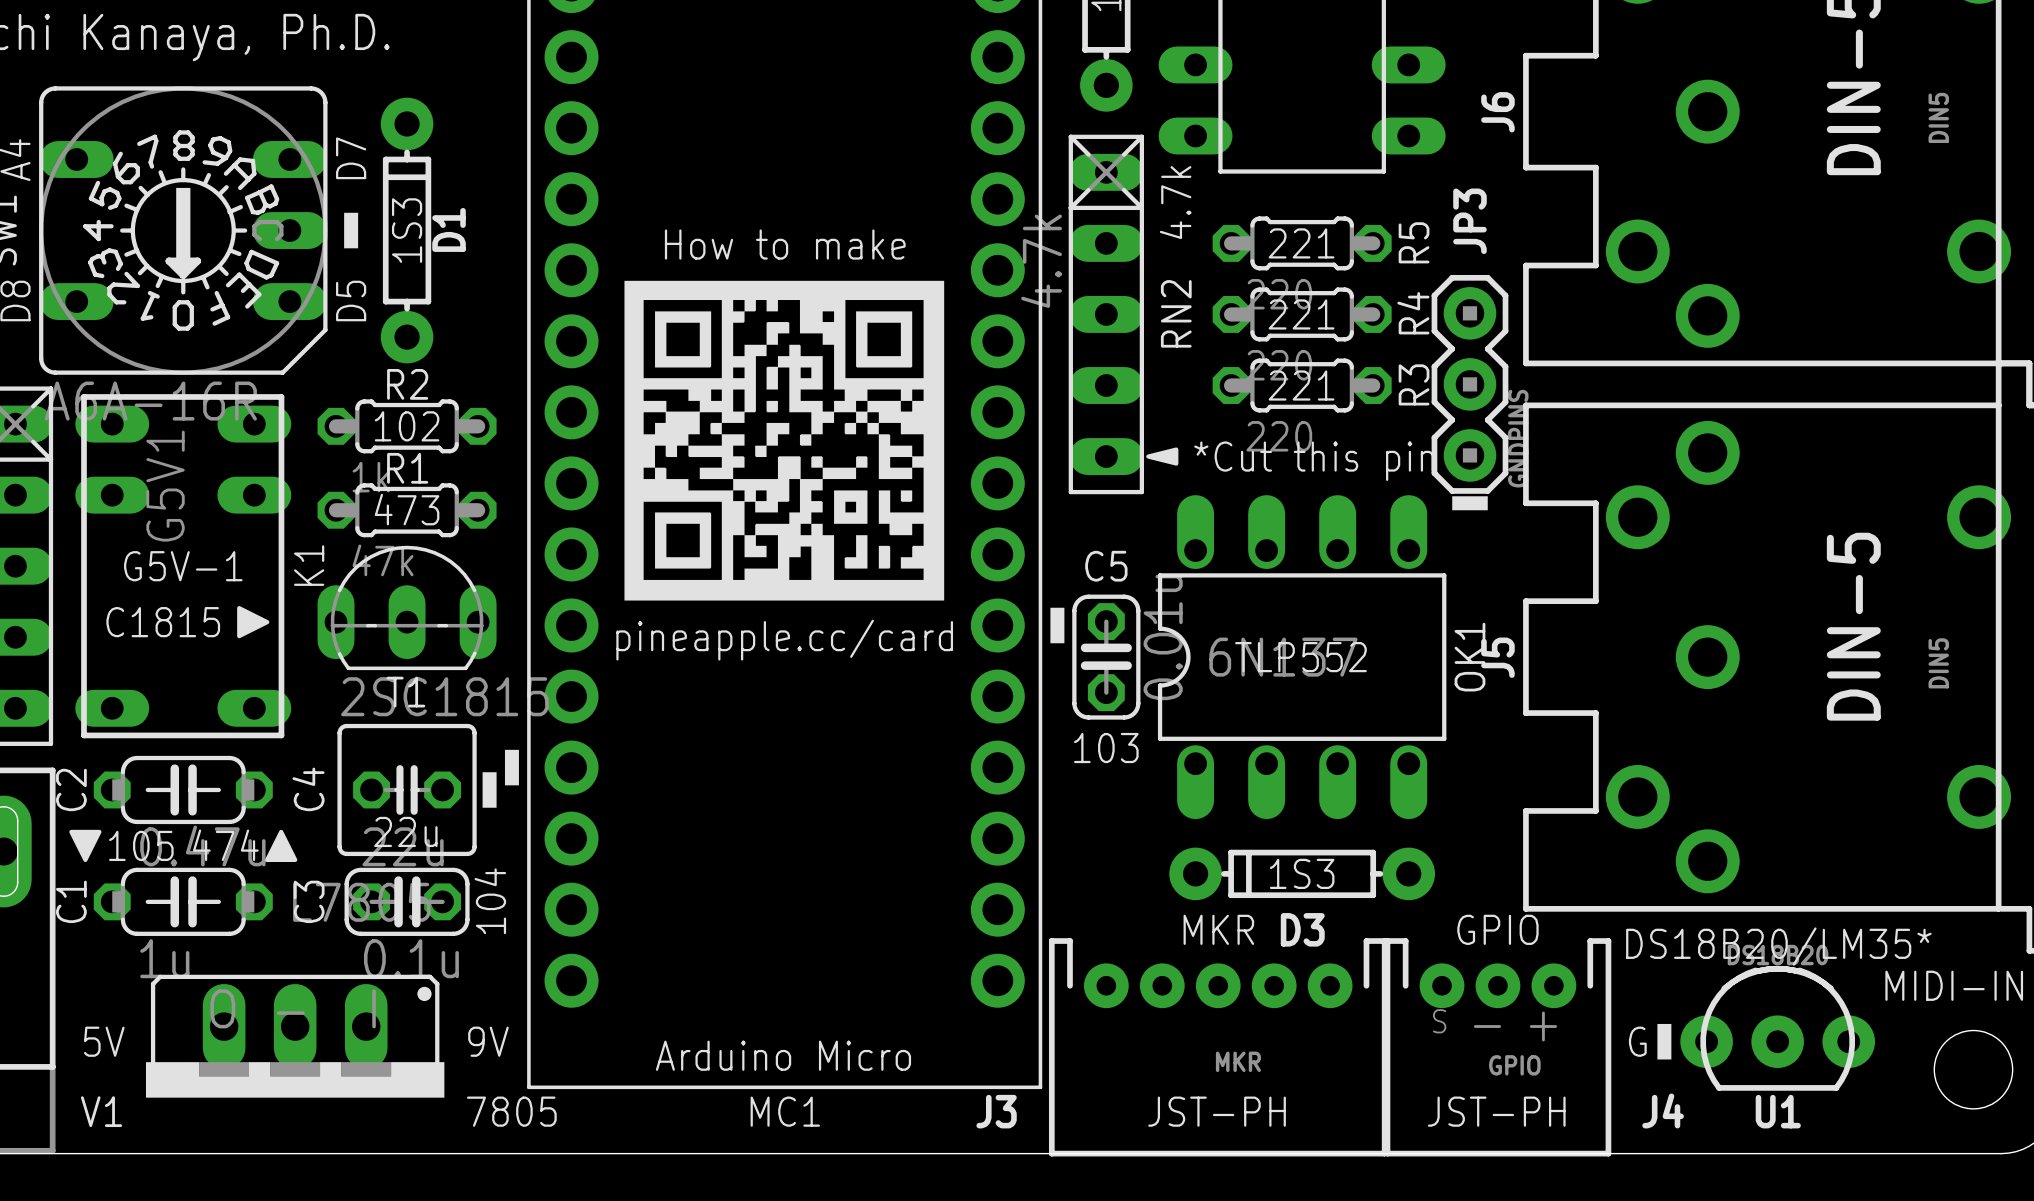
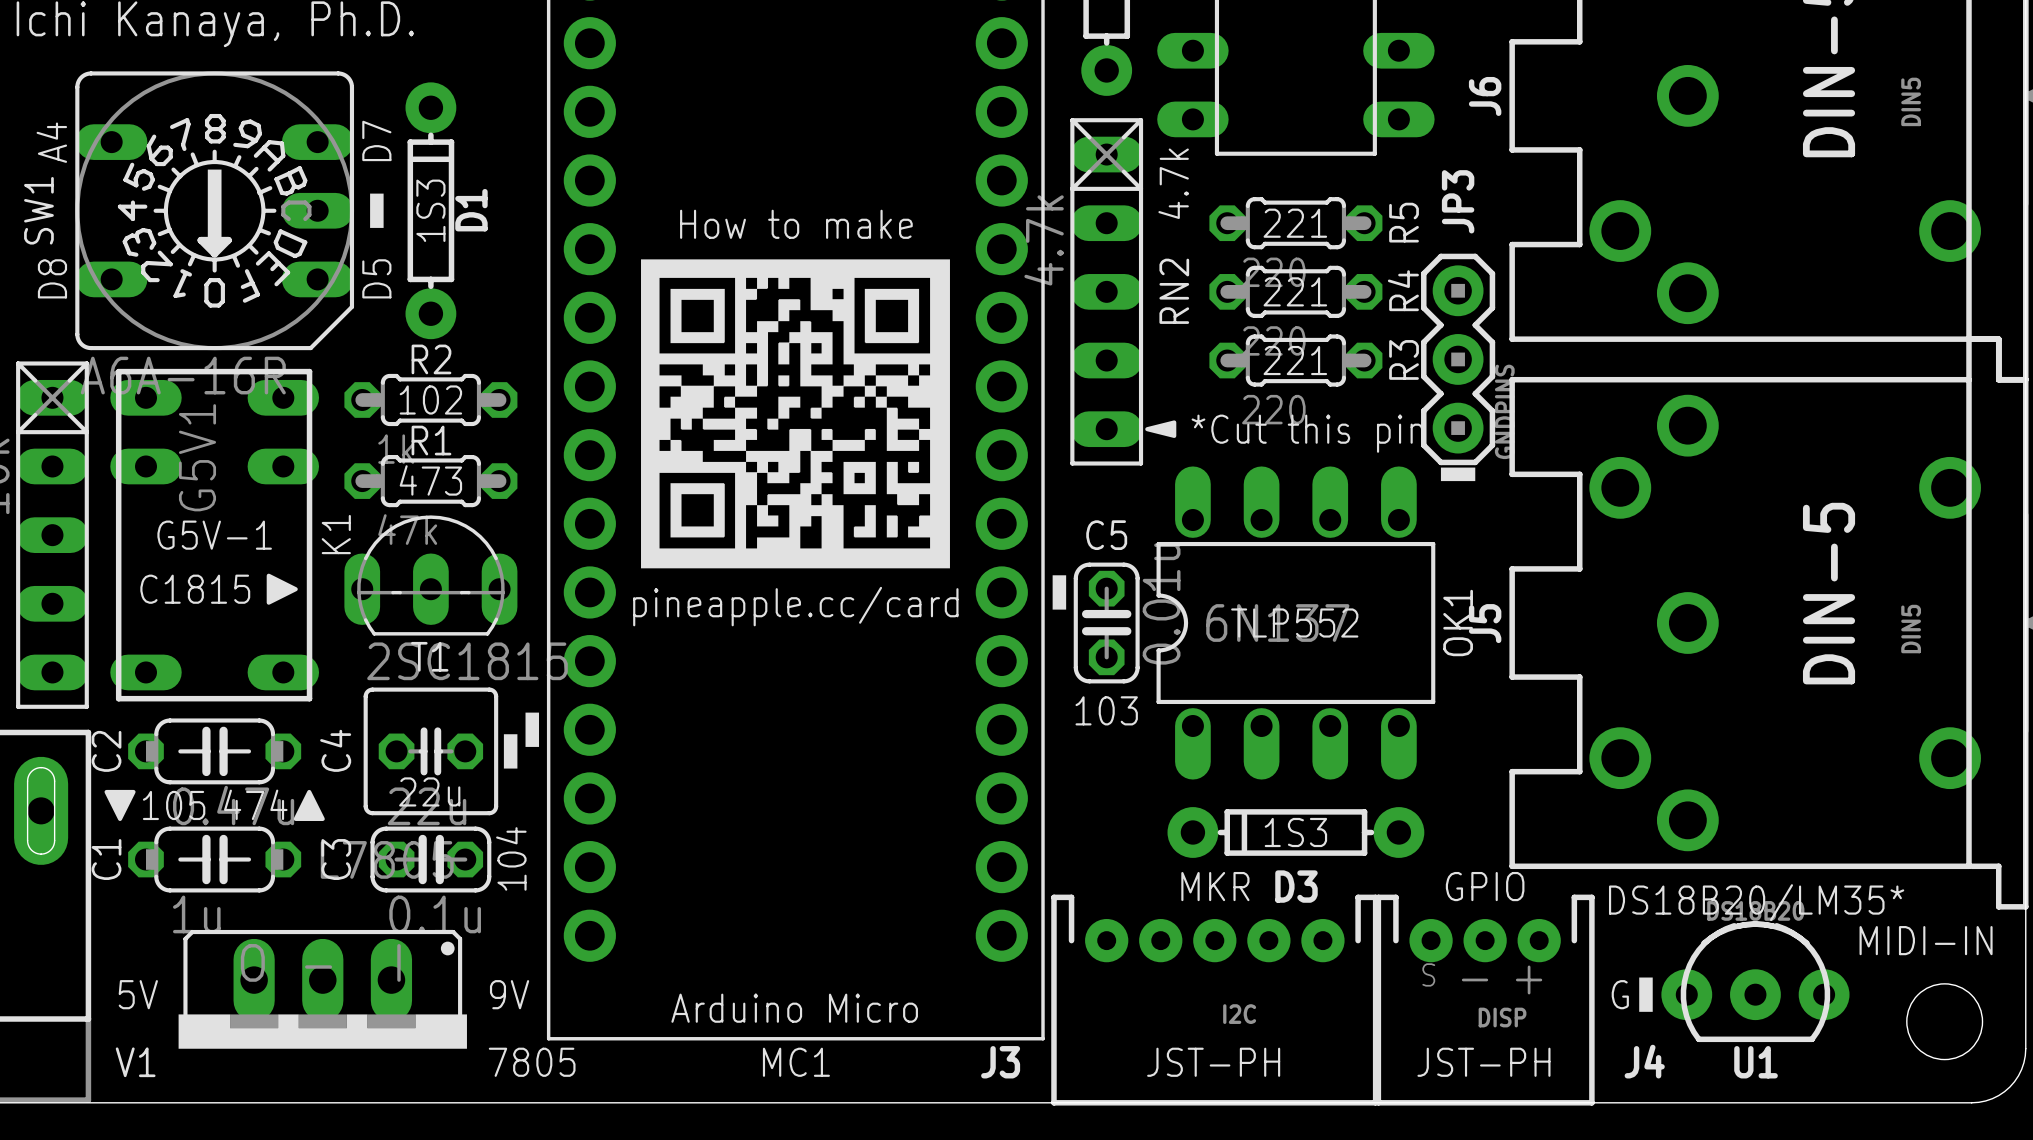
J3 value: MKR (1238, 1061) -> I2C (1239, 1014)
J4 value: GPIO (1514, 1065) -> DISP (1502, 1017)

